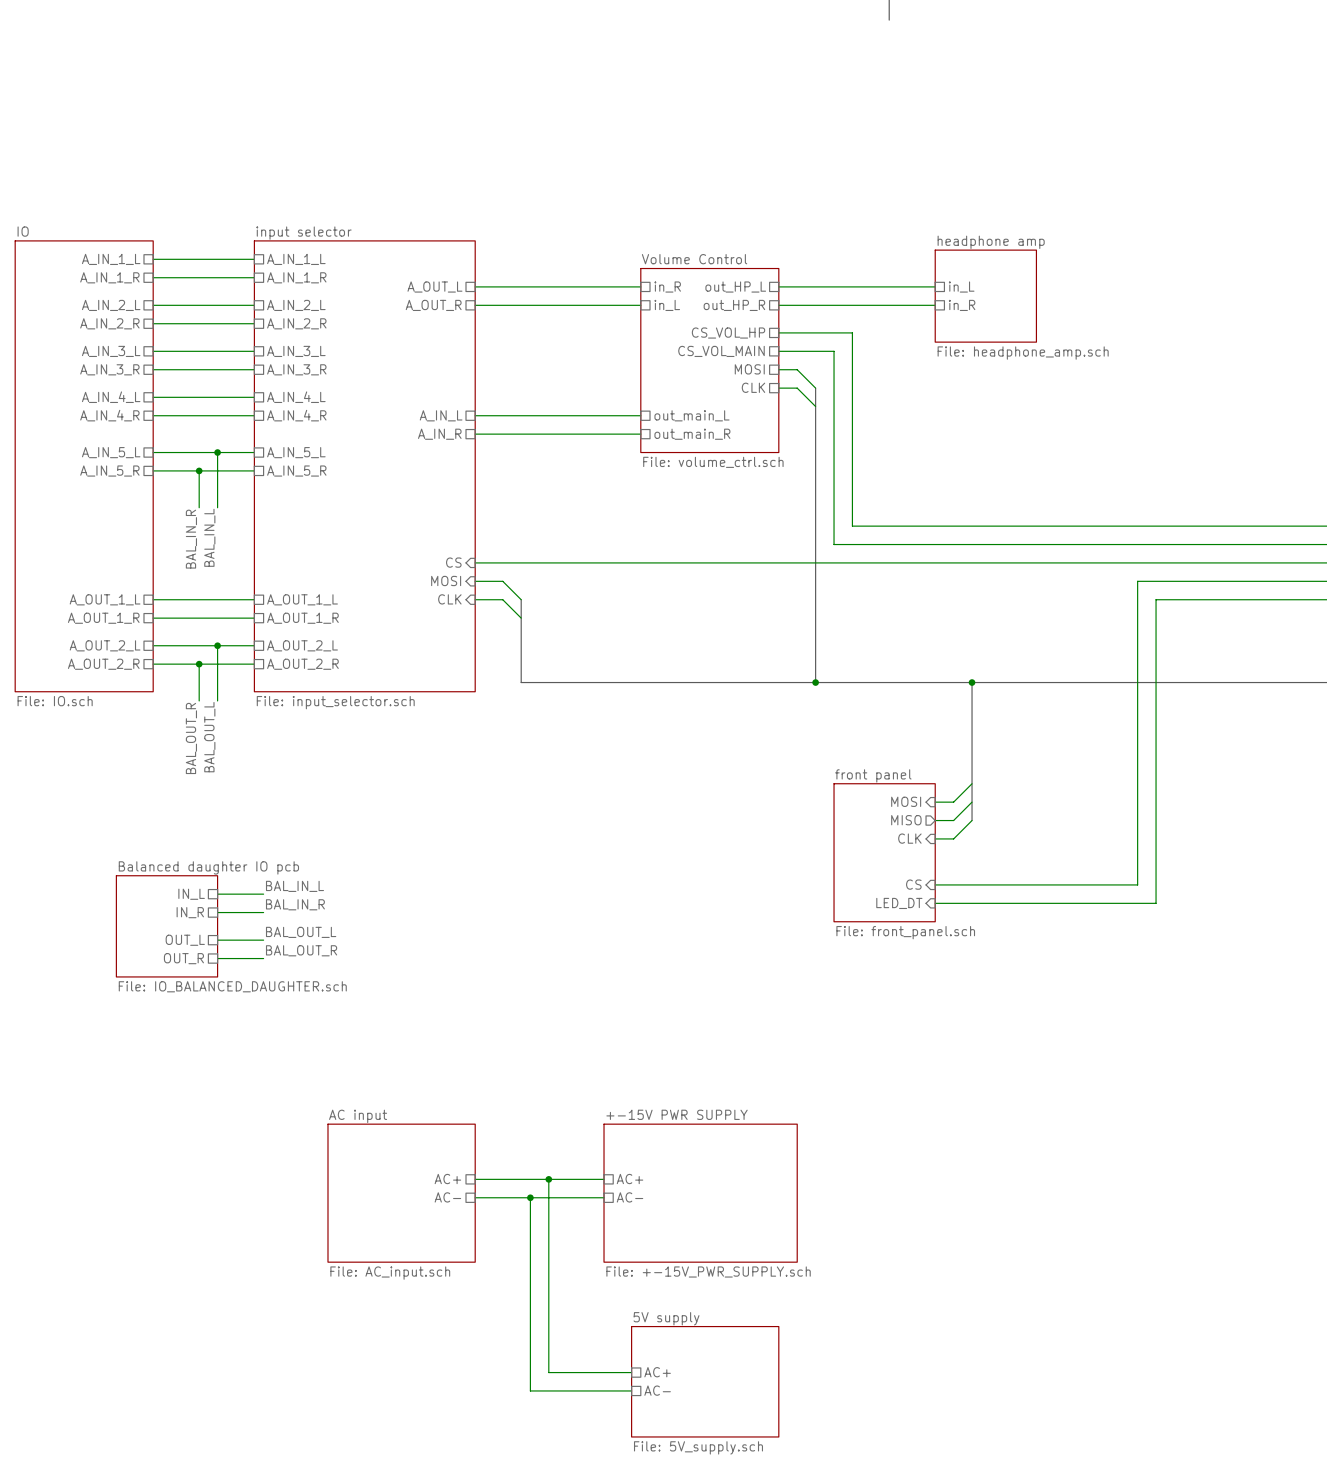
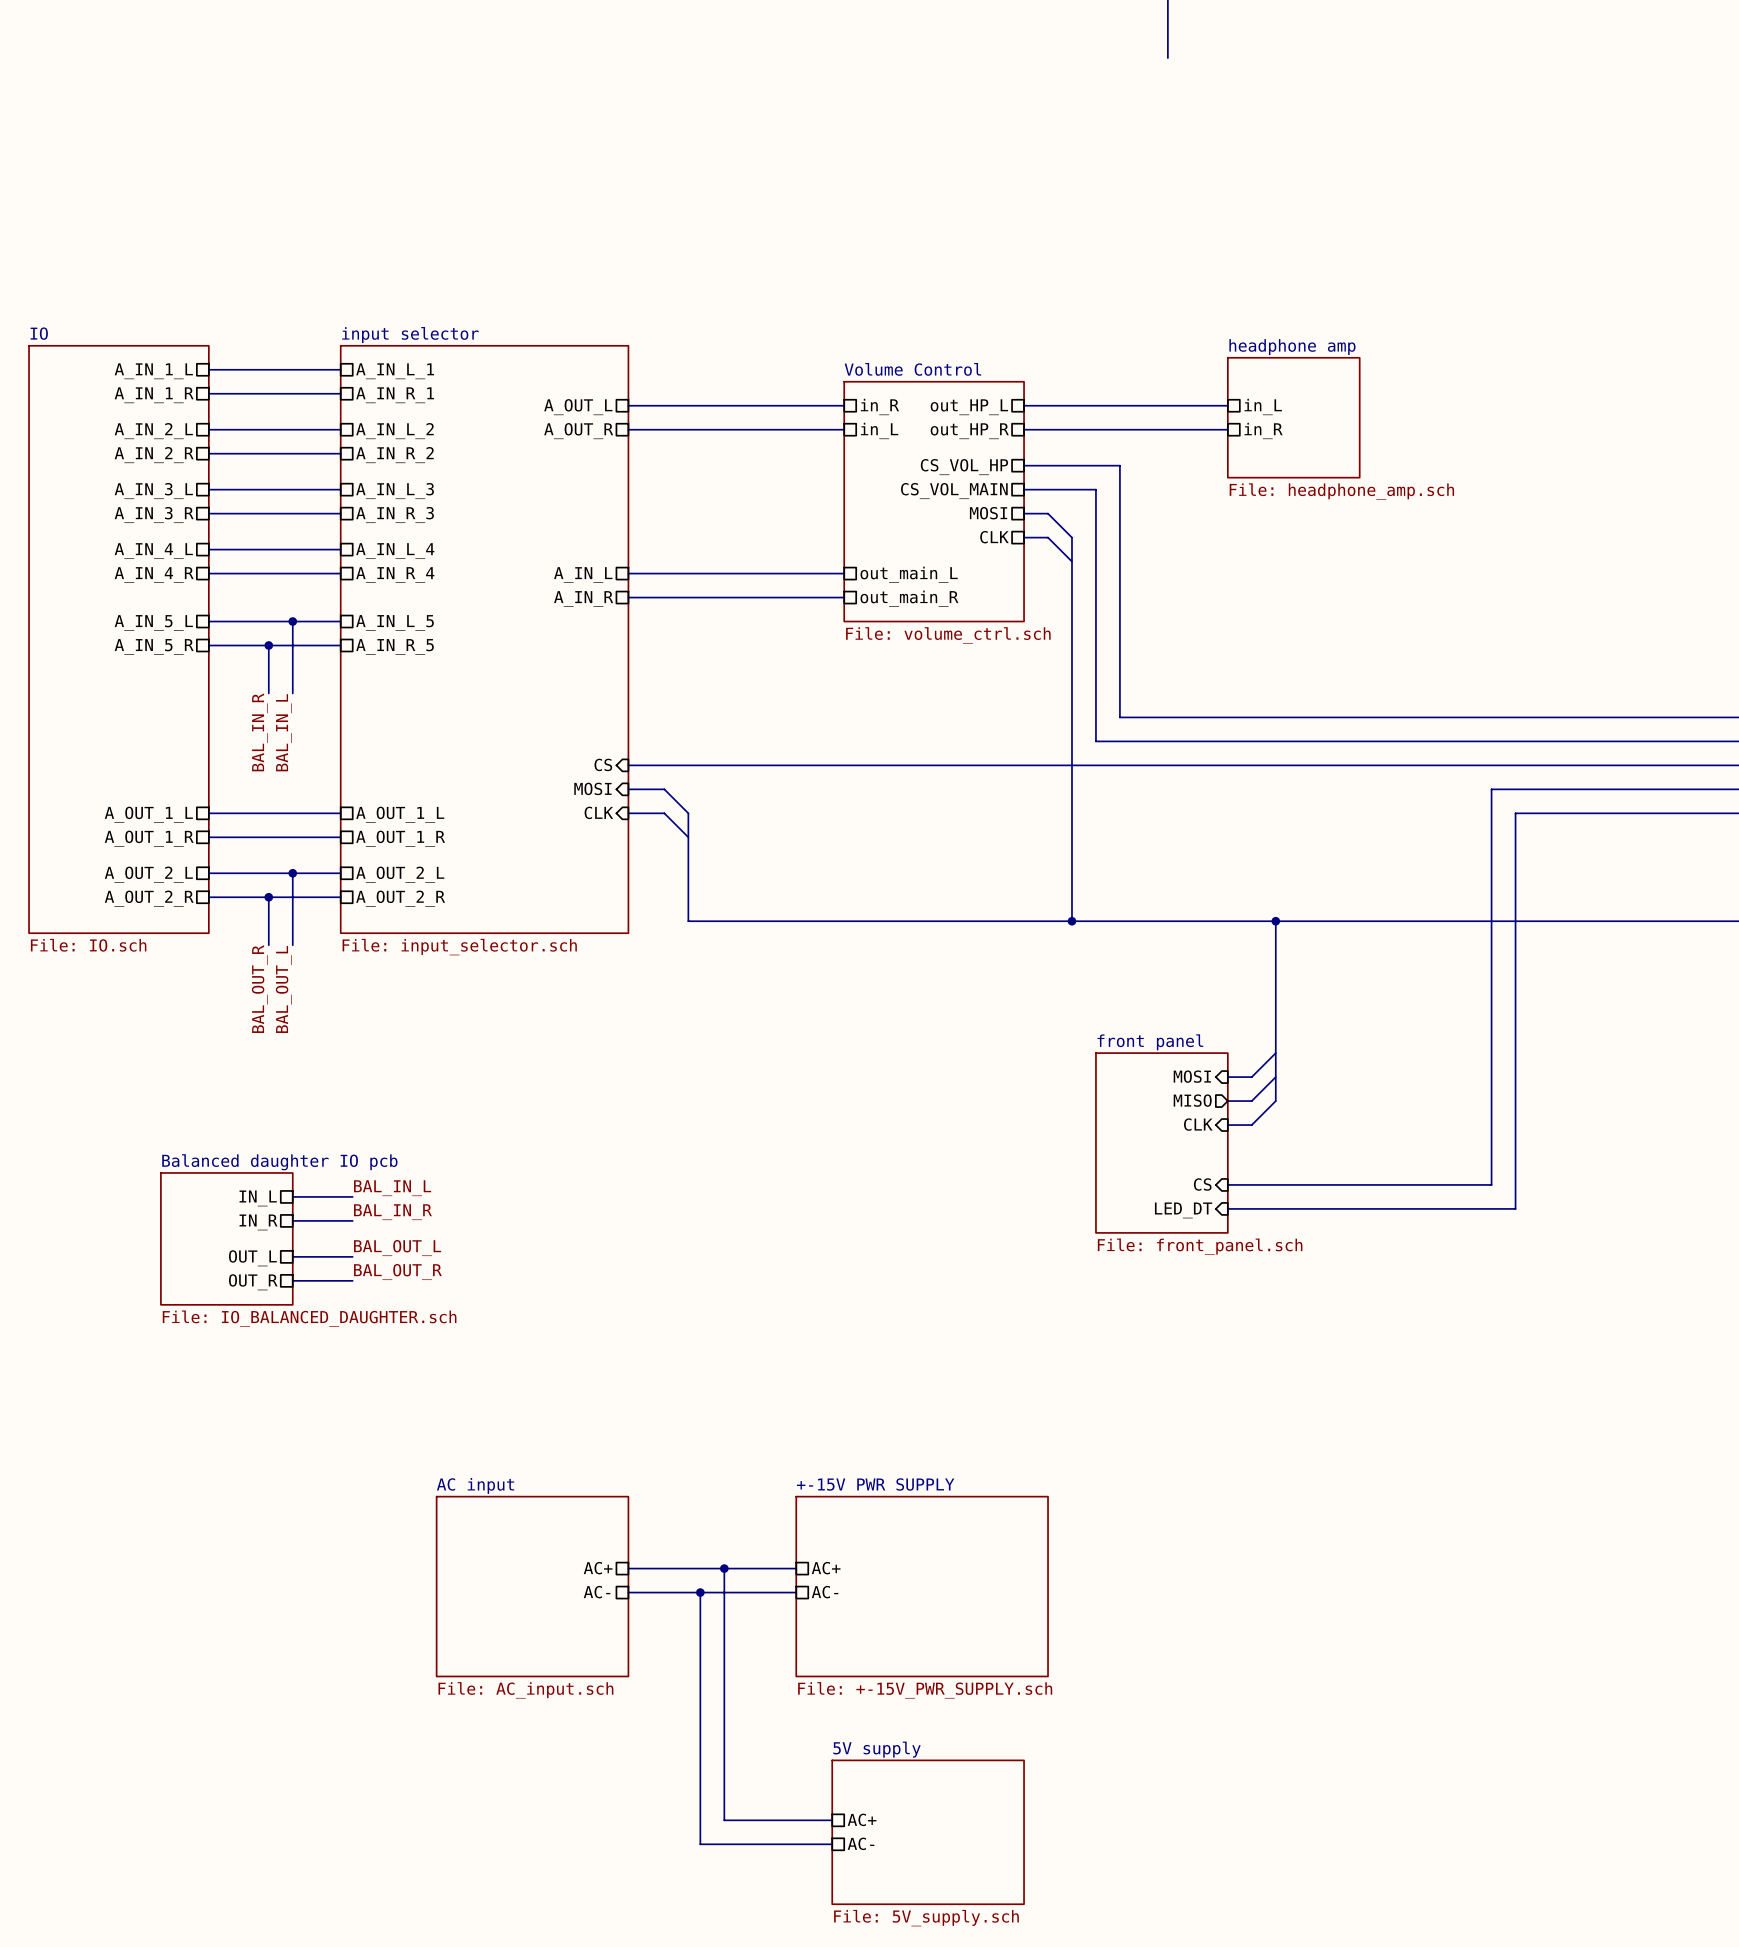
sheet pin: A_IN_1_L (296, 259) -> A_IN_L_1 (395, 371)
sheet pin: A_IN_1_R (296, 277) -> A_IN_R_1 (395, 395)
sheet pin: A_IN_2_L (296, 305) -> A_IN_L_2 (394, 431)
sheet pin: A_IN_2_R (296, 323) -> A_IN_R_2 (394, 455)
sheet pin: A_IN_3_L (296, 351) -> A_IN_L_3 (395, 491)
sheet pin: A_IN_3_R (296, 369) -> A_IN_R_3 (395, 515)
sheet pin: A_IN_4_L (296, 397) -> A_IN_L_4 (395, 551)
sheet pin: A_IN_4_R (296, 415) -> A_IN_R_4 (395, 575)
sheet pin: A_IN_5_L (296, 452) -> A_IN_L_5 (395, 623)
sheet pin: A_IN_5_R (296, 471) -> A_IN_R_5 (395, 646)

